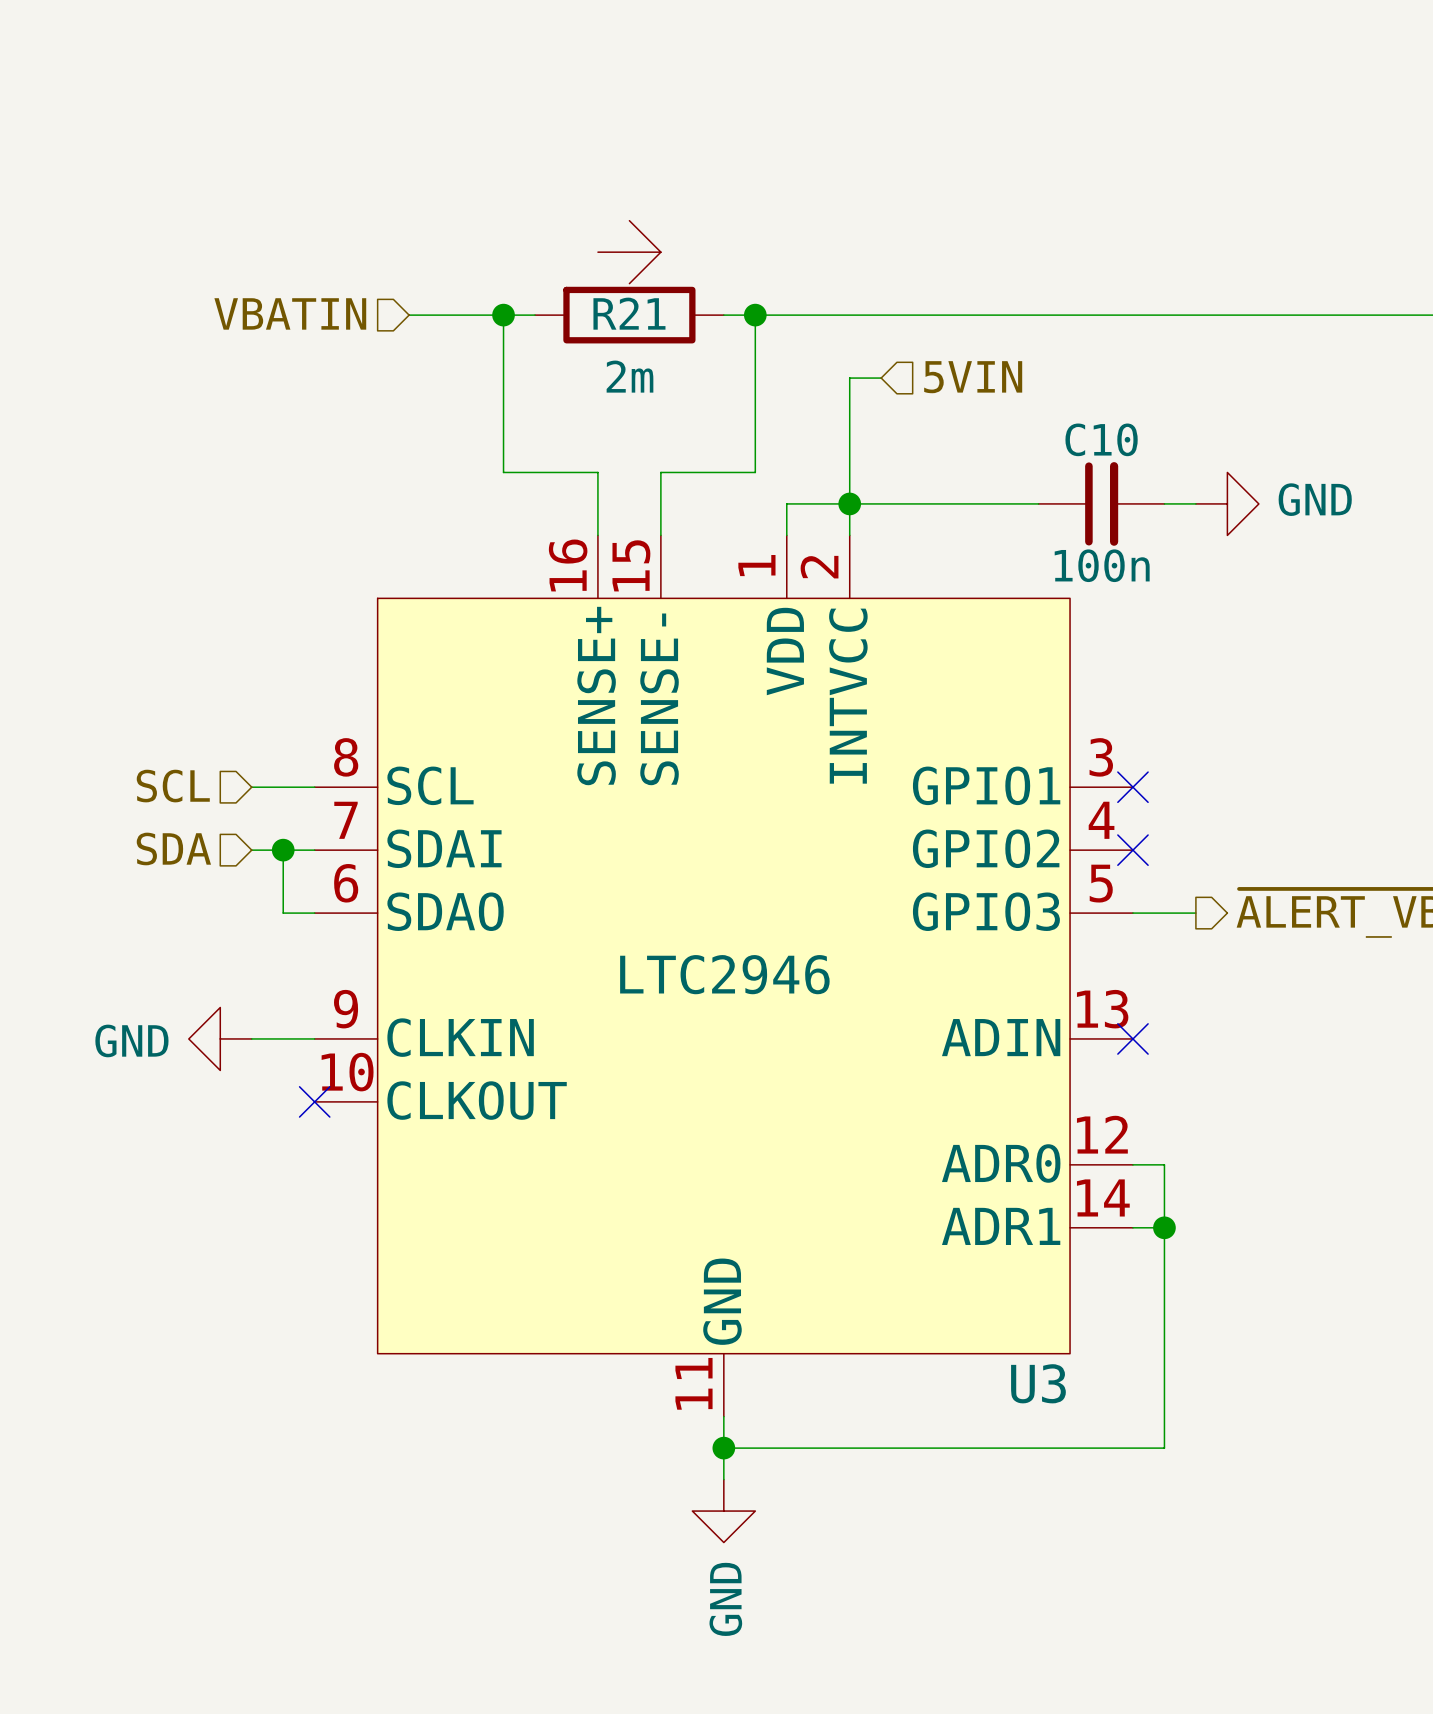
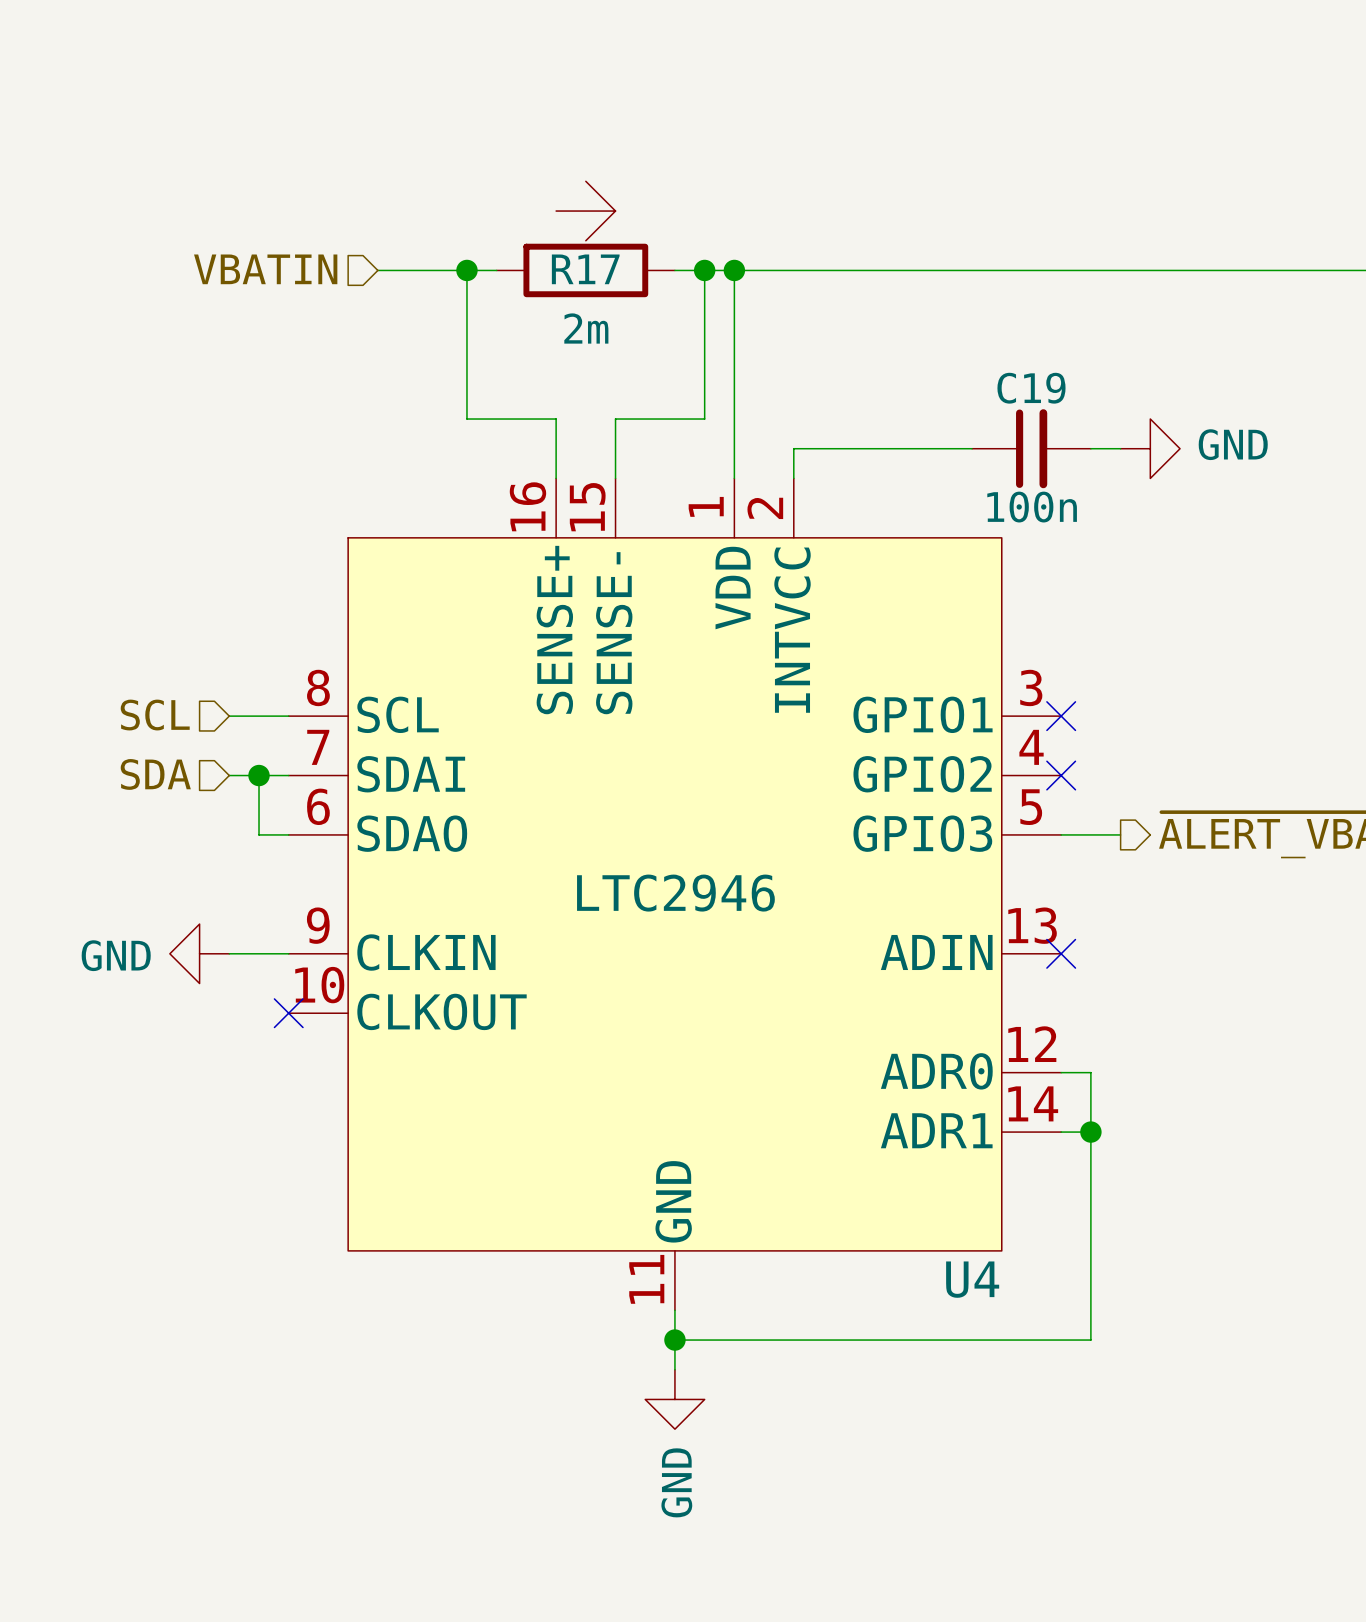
R21 name: R21 (629, 313) -> R17 (585, 269)
junction: none -> (734, 270)
hierarchical label: 5VIN (973, 377) -> none
wire: (881, 378) (849, 378) (849, 503) (786, 503) -> (734, 270) (734, 448)
C10 name: C10 (1101, 439) -> C19 (1031, 388)
junction: (849, 503) -> none
U3 name: U3 (1038, 1383) -> U4 (972, 1279)

